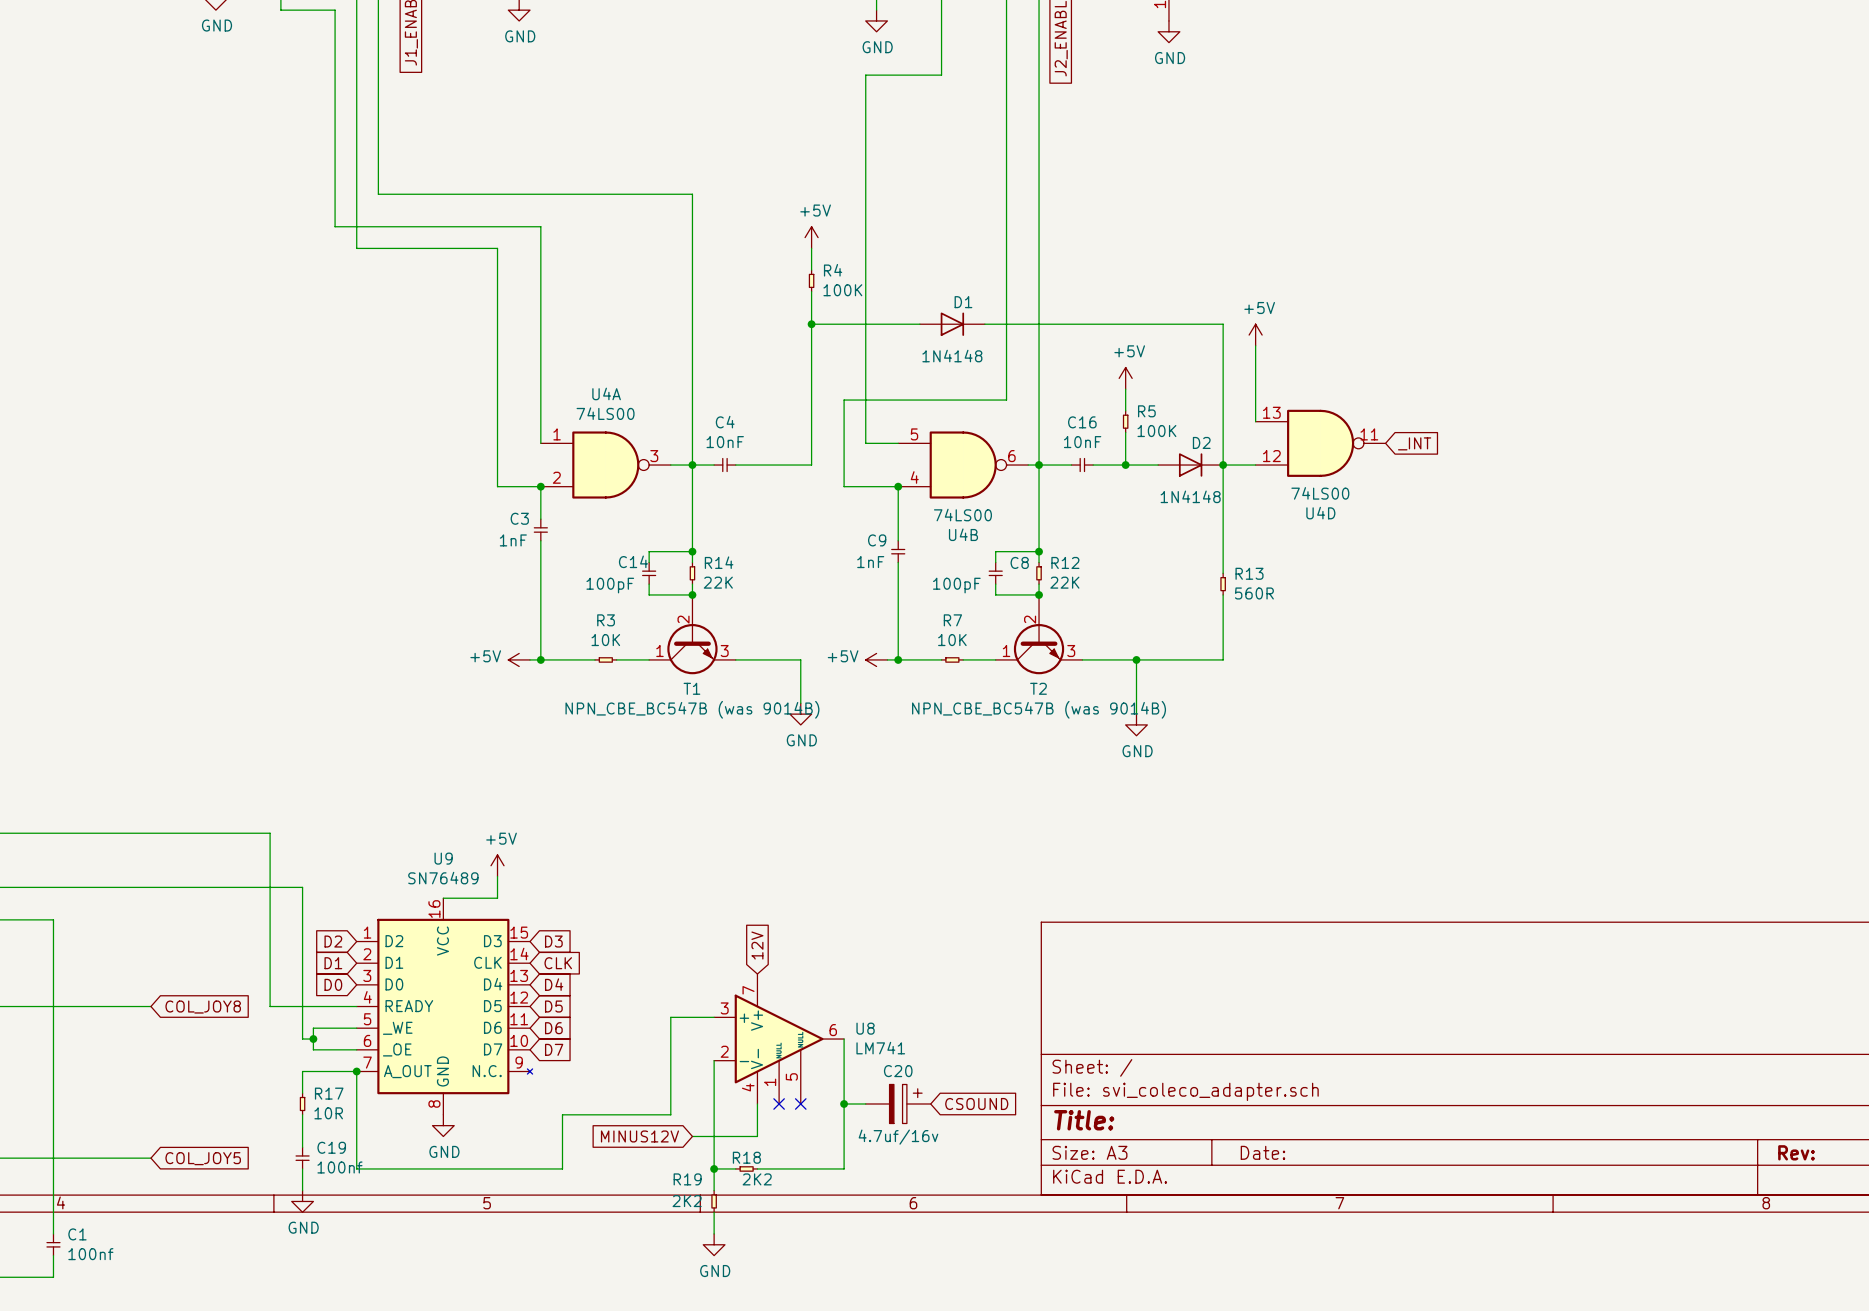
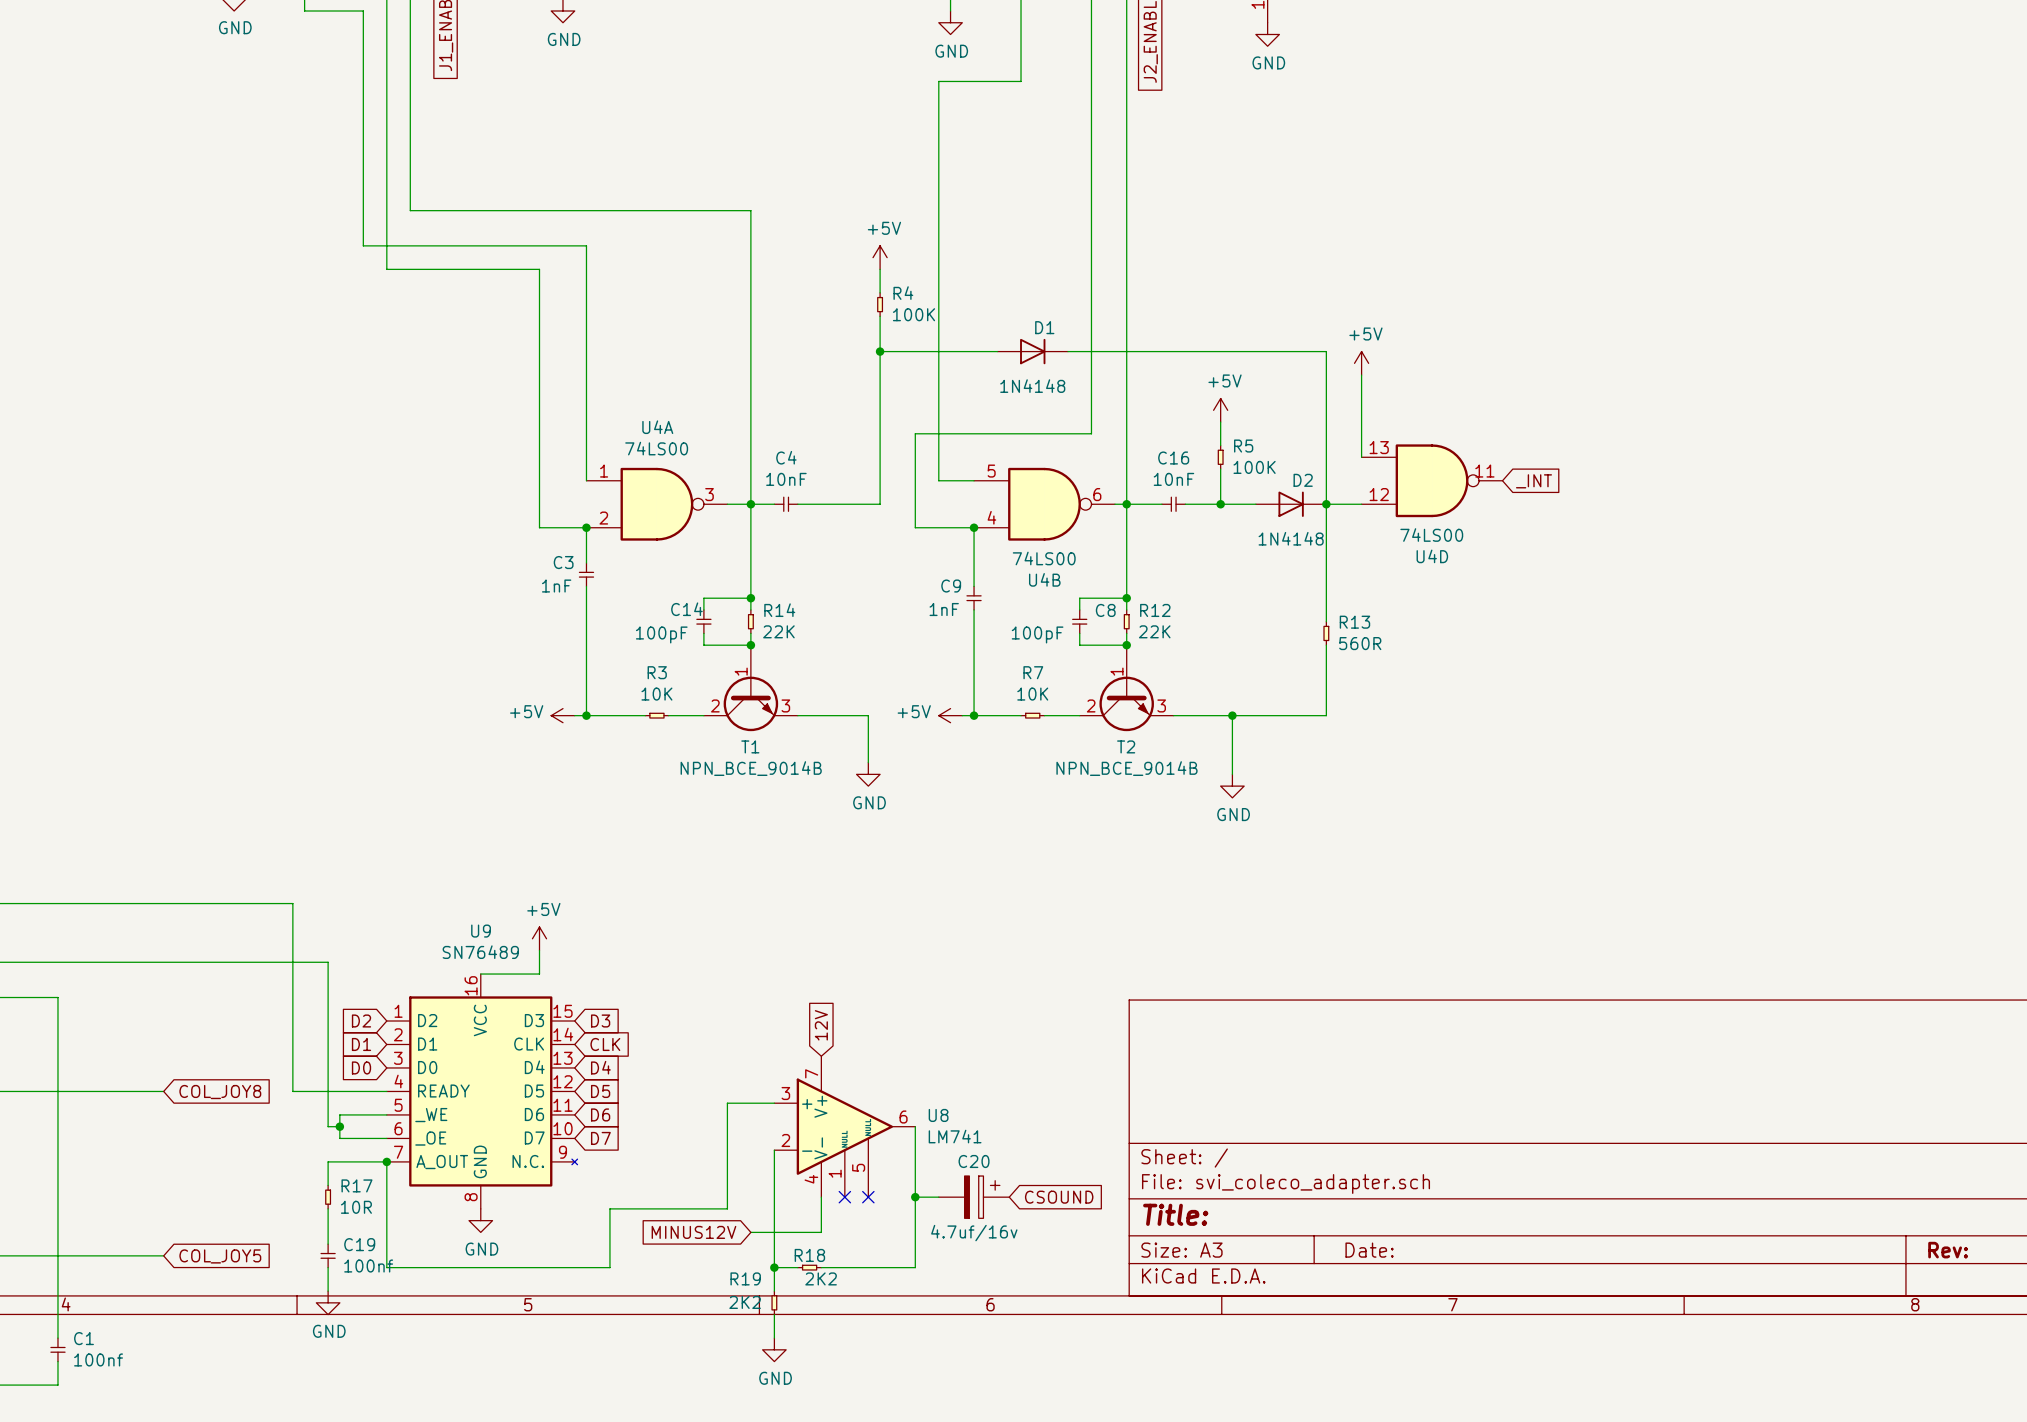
T1 pin number: 2 (683, 619) -> 1 (741, 671)
T2 pin number: 2 (1030, 619) -> 1 (1117, 671)
T1 pin number: 1 (659, 651) -> 2 (715, 705)
T2 pin number: 1 (1006, 651) -> 2 (1091, 705)
T1 value: NPN_CBE_BC547B (was 9014B) (692, 709) -> NPN_BCE_9014B (751, 768)
T2 value: NPN_CBE_BC547B (was 9014B) (1039, 709) -> NPN_BCE_9014B (1126, 768)

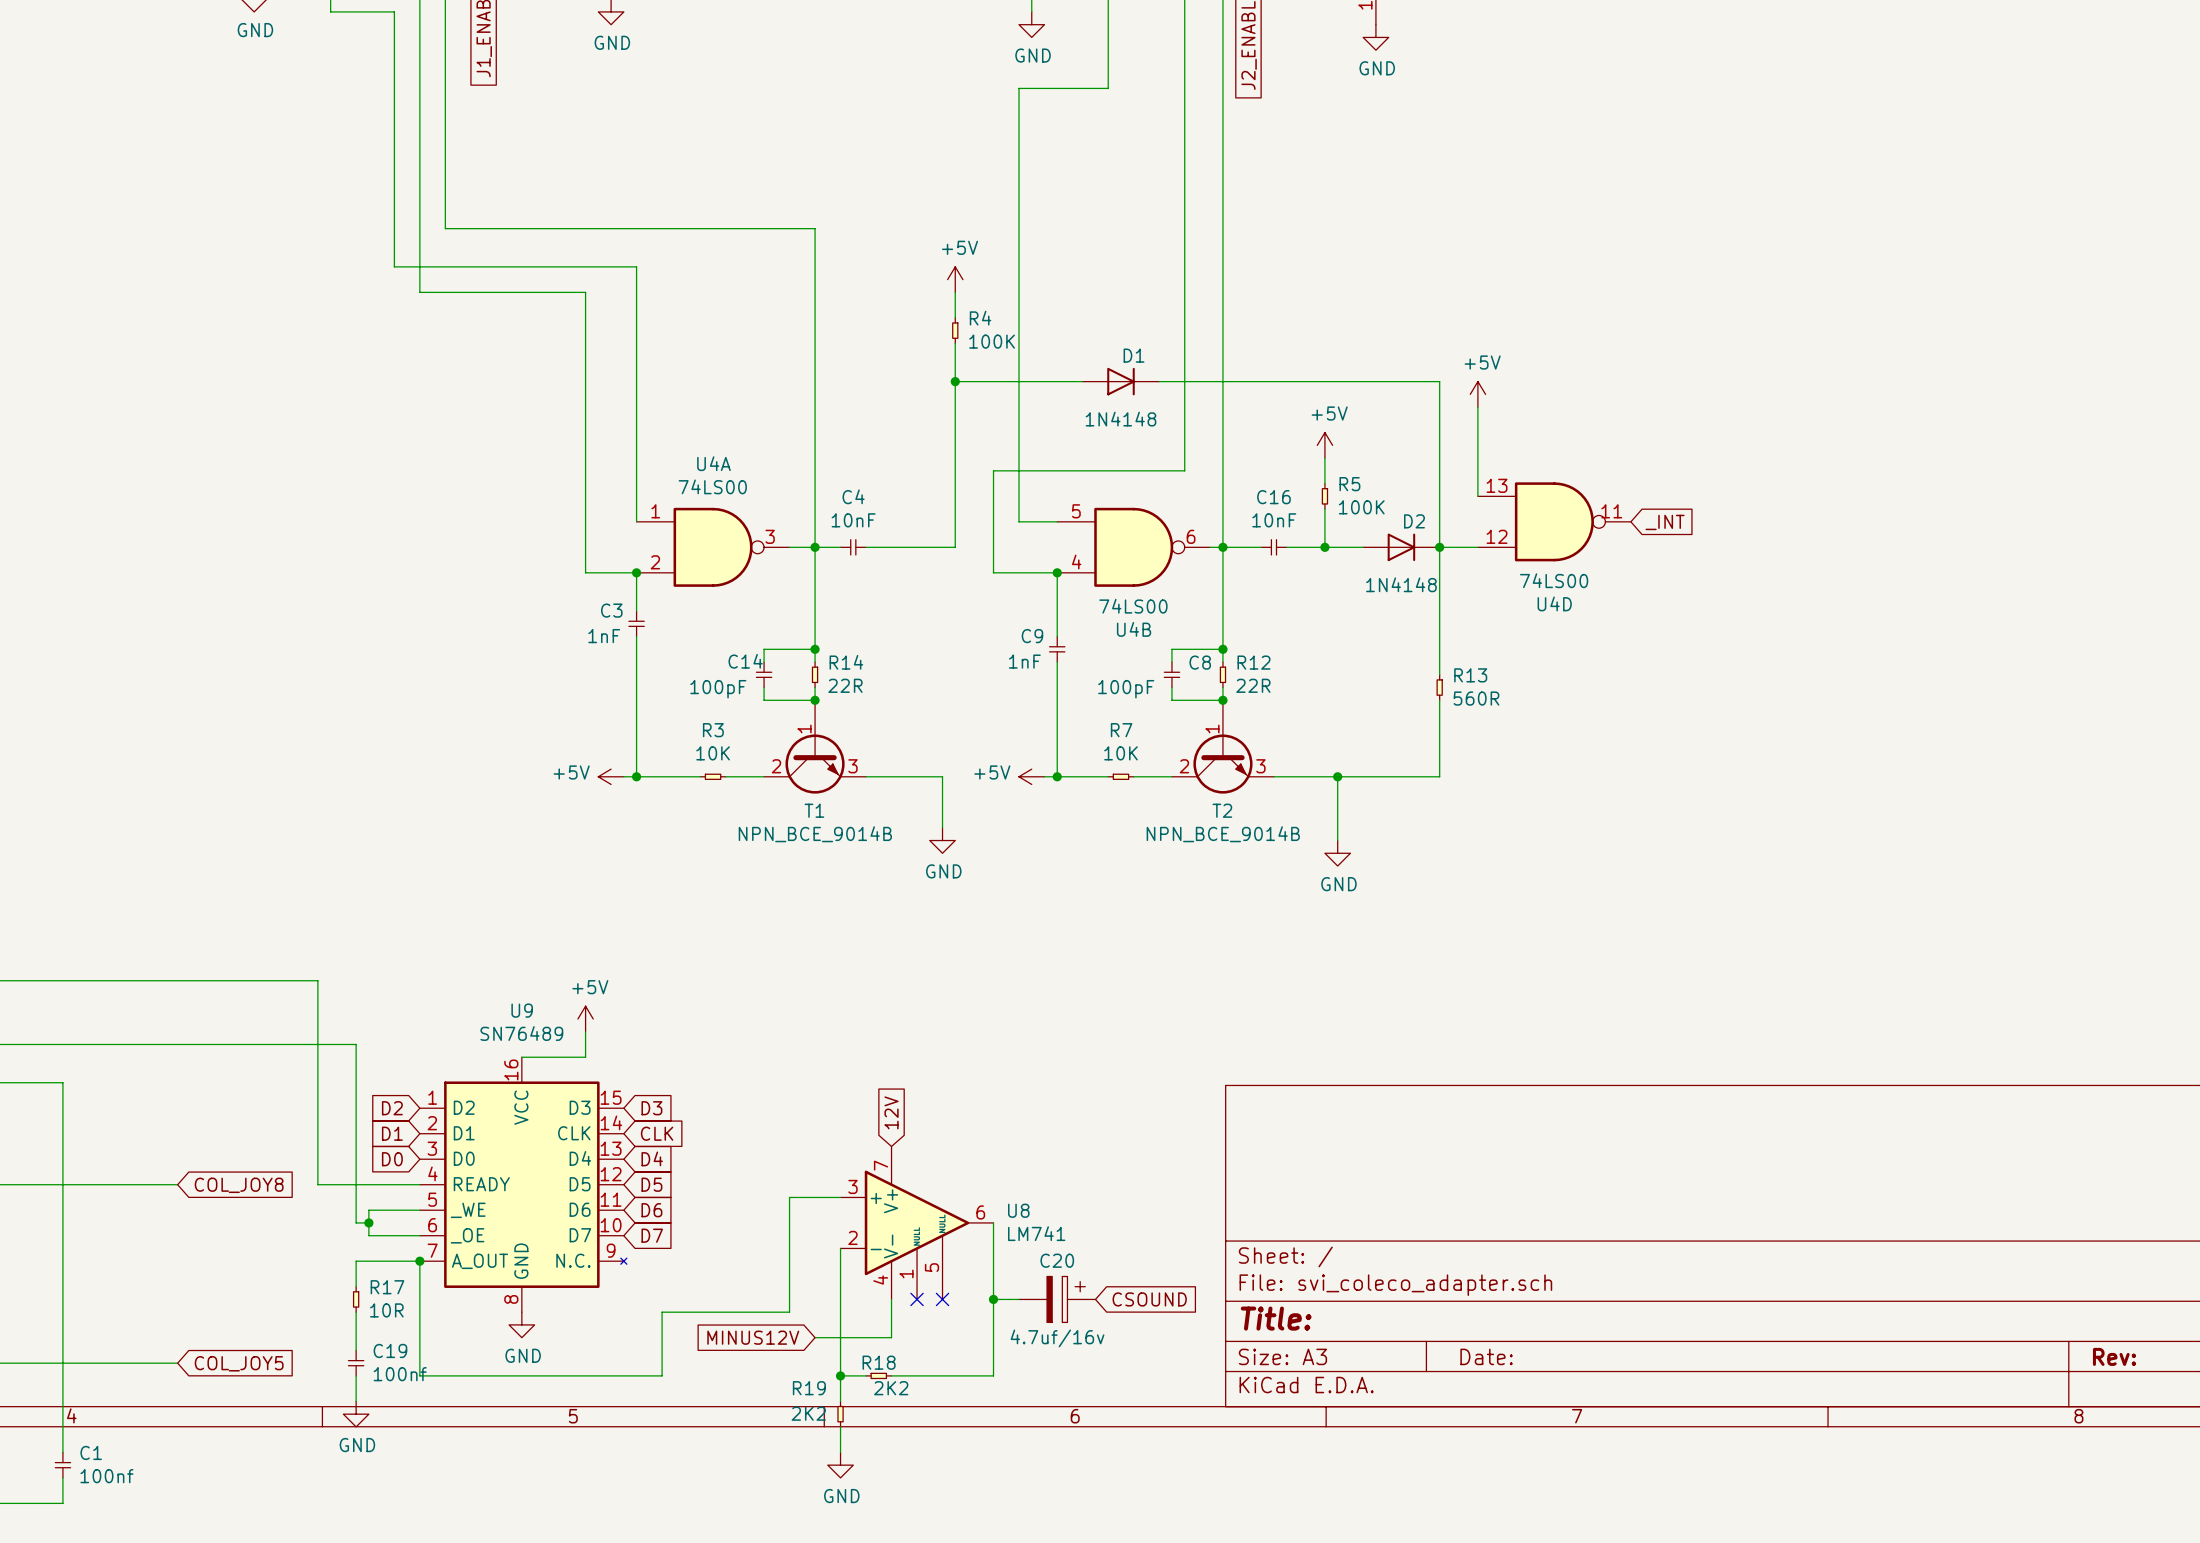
R14 value: 22K (778, 631) -> 22R (845, 685)
R12 value: 22K (1154, 631) -> 22R (1253, 685)

